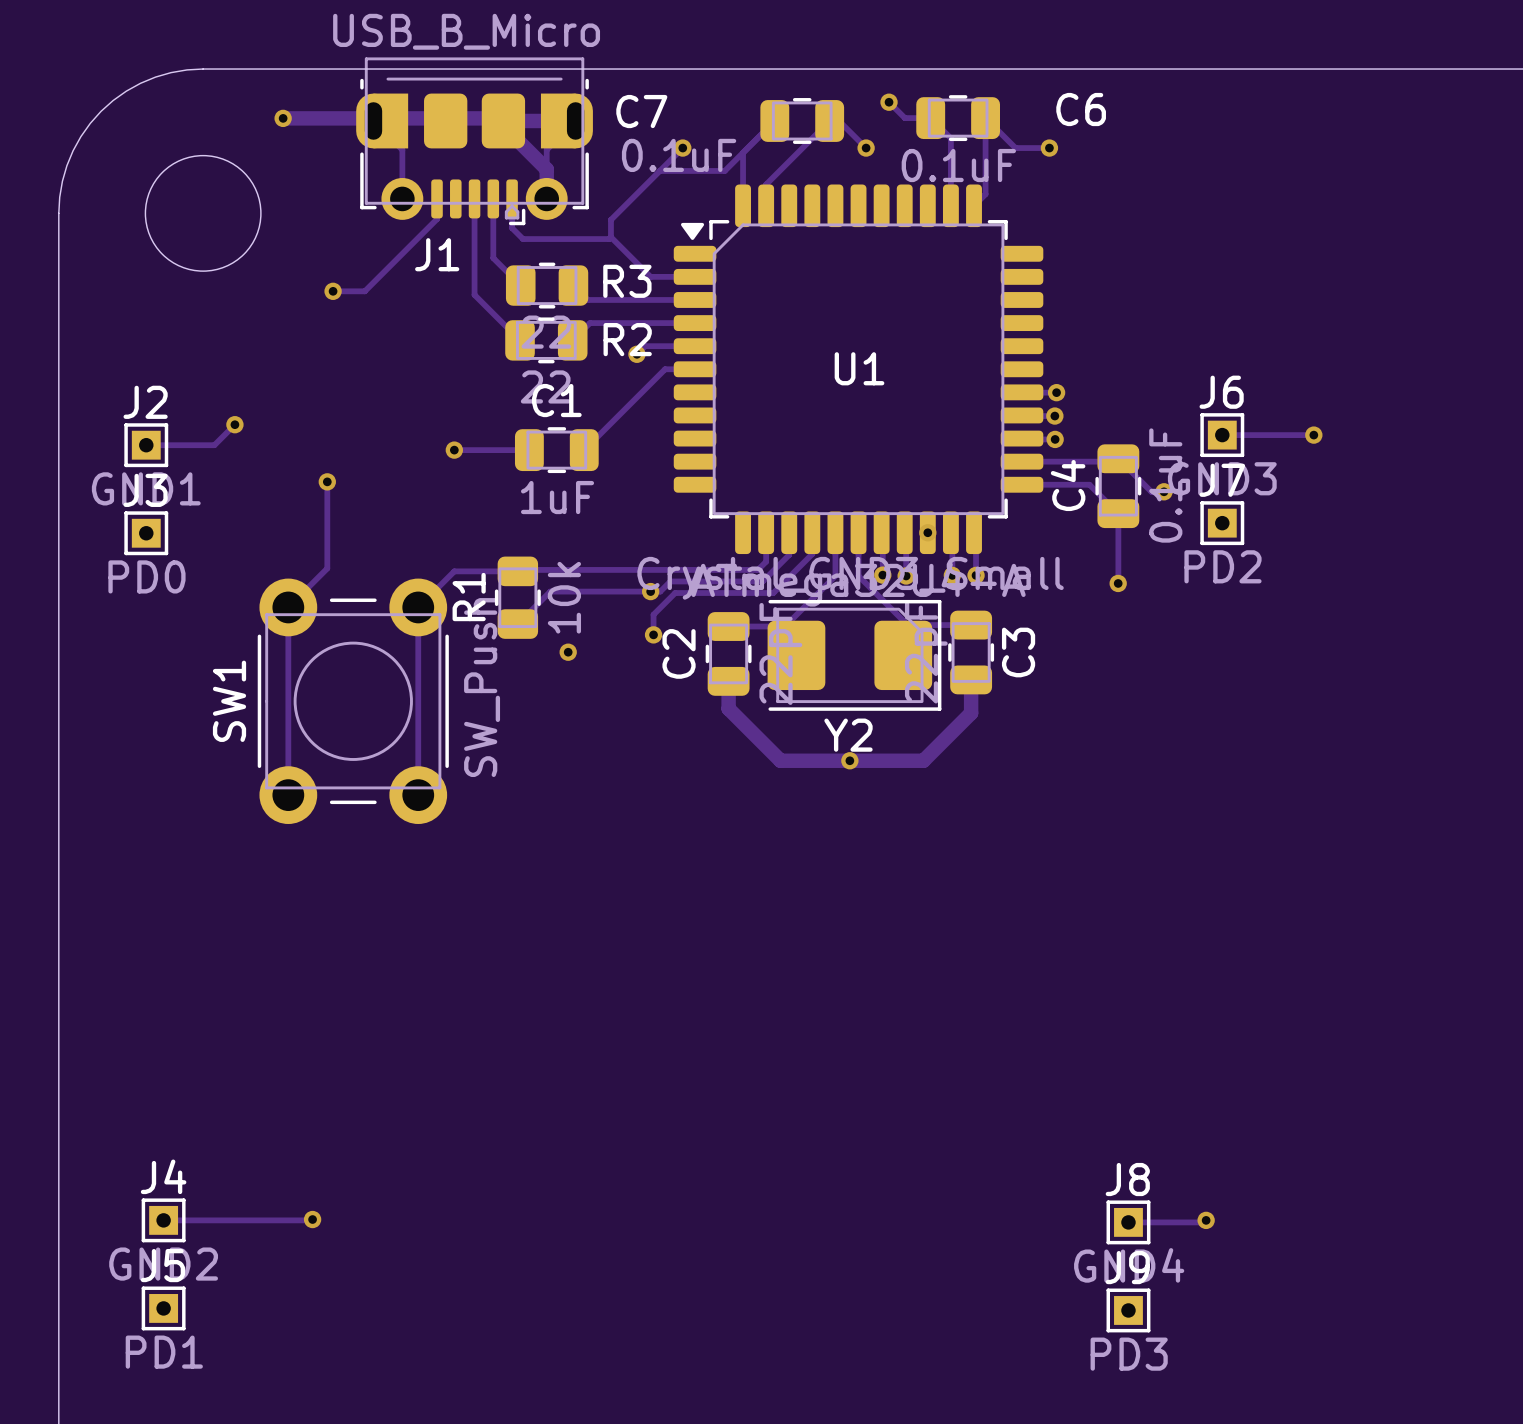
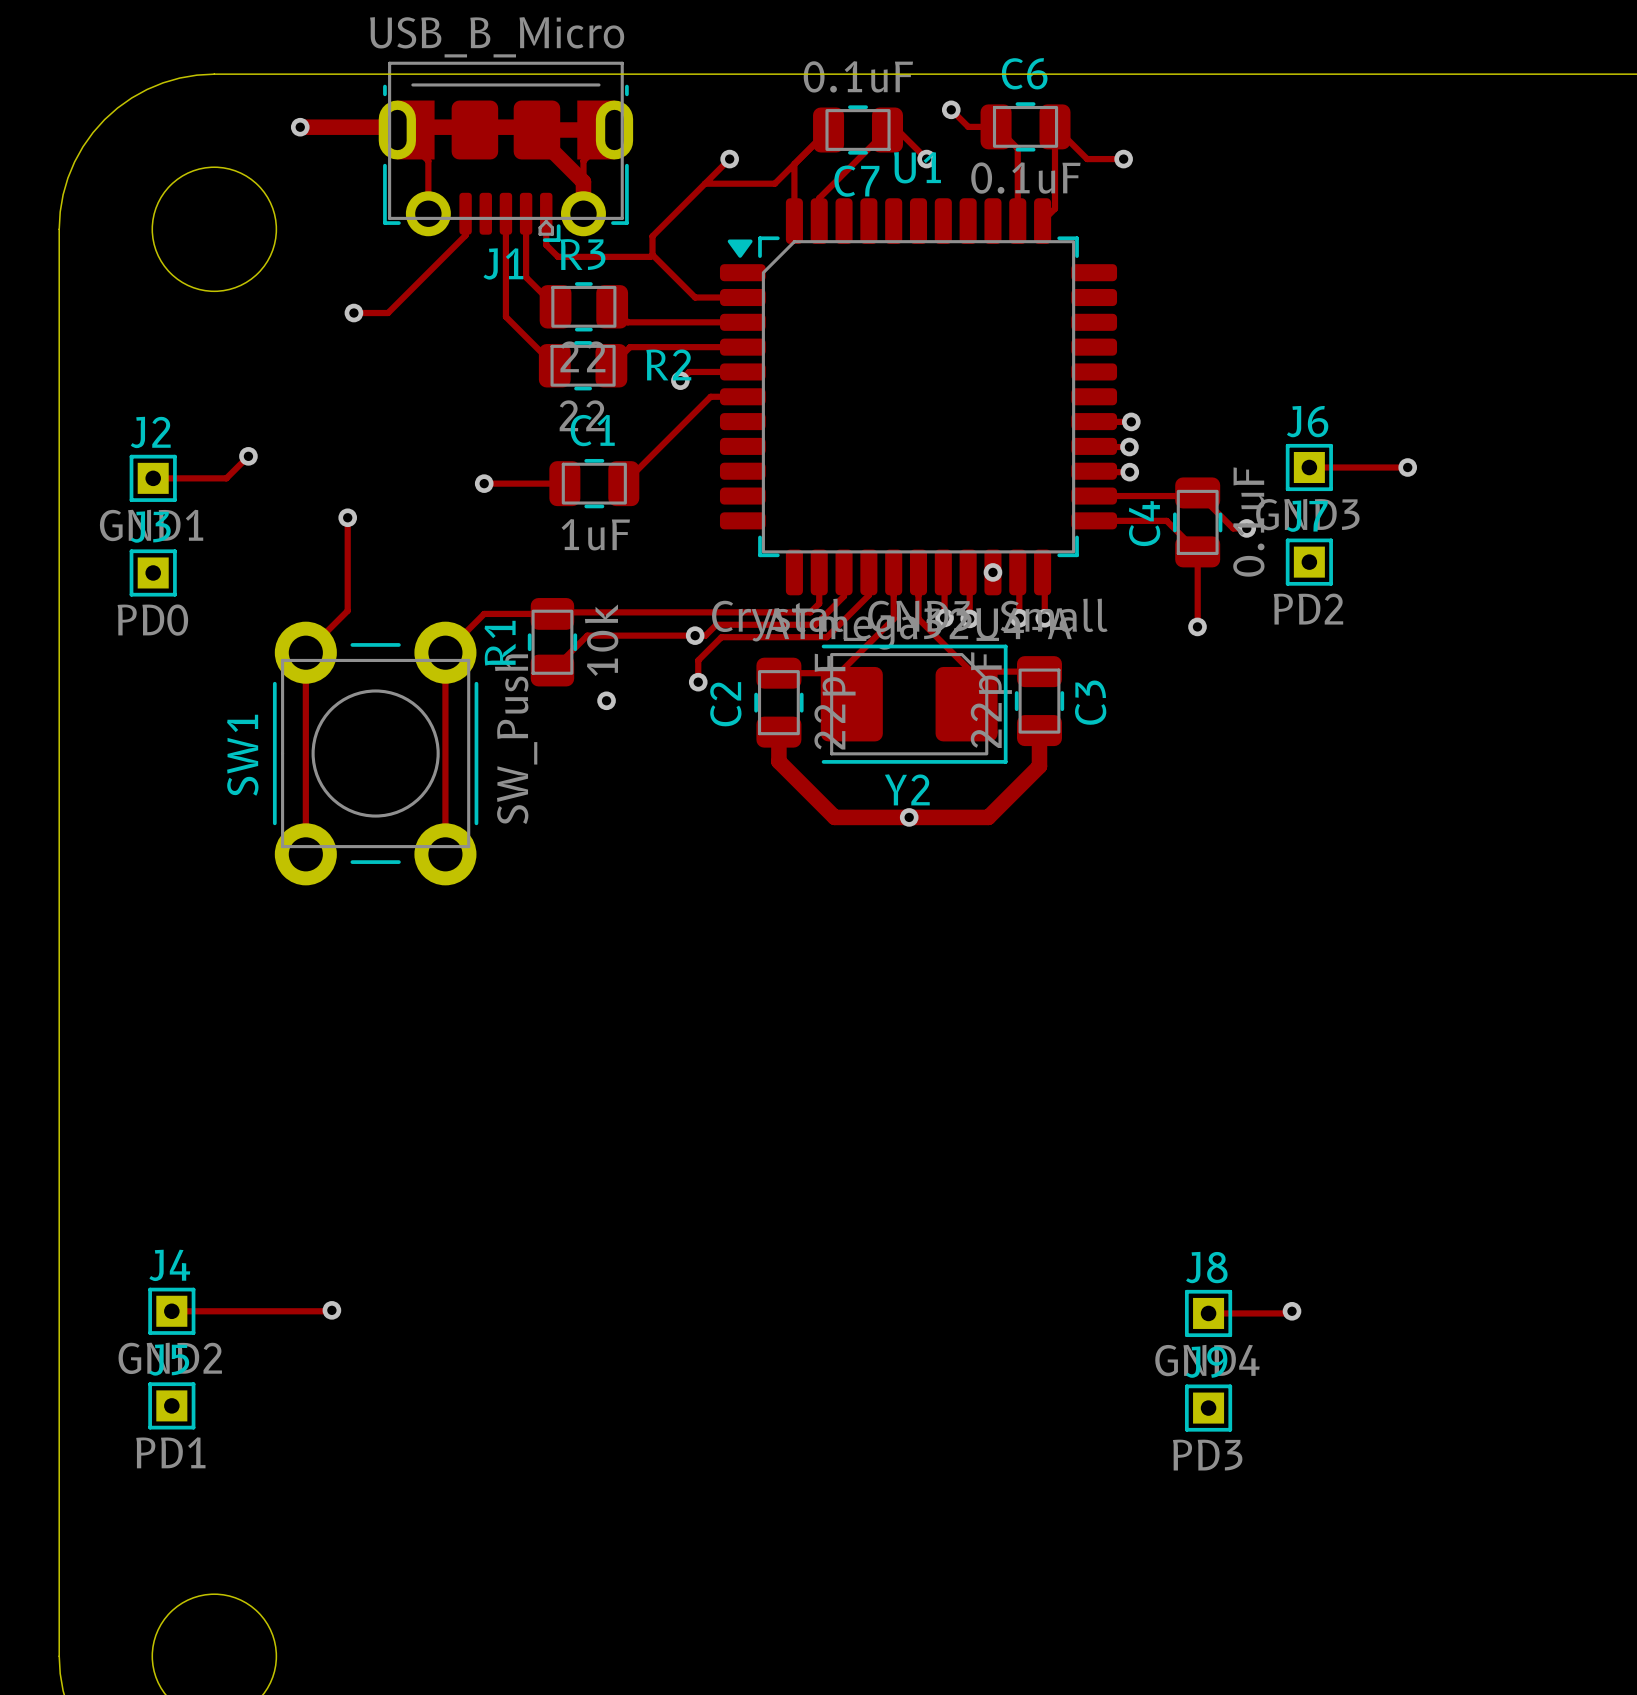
C6 name position: C6 (1081, 109) -> C6 (1024, 73)
C7 name position: C7 (641, 111) -> C7 (856, 181)
C7 value position: 0.1uF (679, 155) -> 0.1uF (858, 76)
J1 name position: J1 (437, 254) -> J1 (503, 263)
R3 name position: R3 (627, 281) -> R3 (582, 254)
U1 name position: U1 (859, 368) -> U1 (917, 167)

